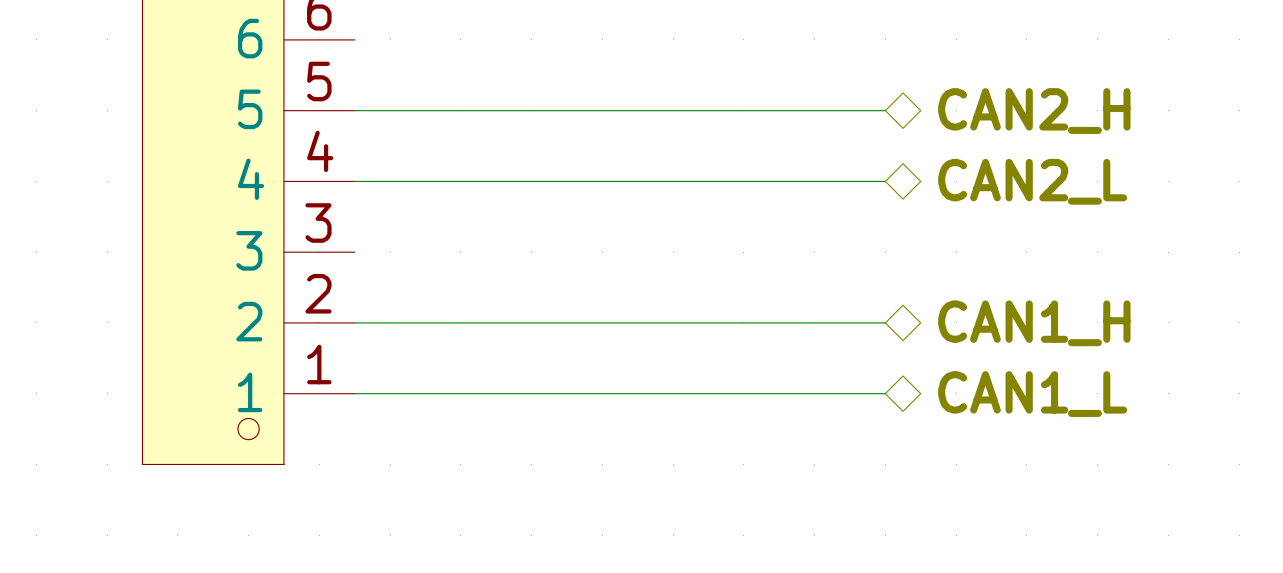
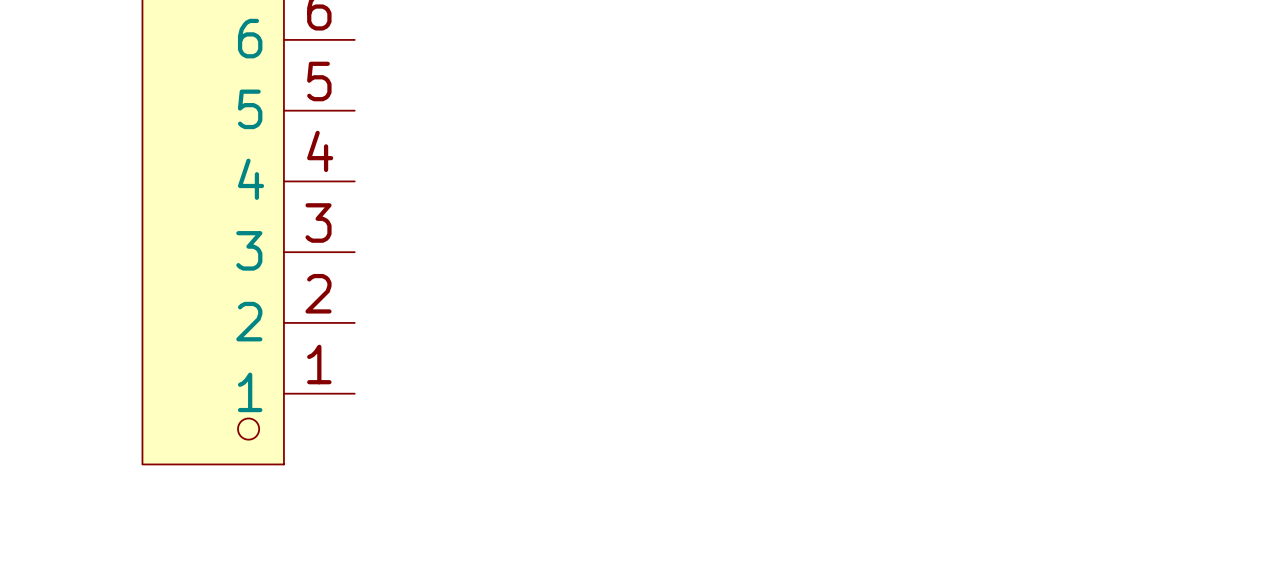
wire: (354, 110) (885, 110) -> none
hierarchical label: CAN2_H (1034, 111) -> none
wire: (354, 181) (885, 181) -> none
hierarchical label: CAN2_L (1032, 181) -> none
wire: (354, 322) (885, 322) -> none
hierarchical label: CAN1_H (1034, 323) -> none
wire: (354, 393) (885, 393) -> none
hierarchical label: CAN1_L (1032, 394) -> none

